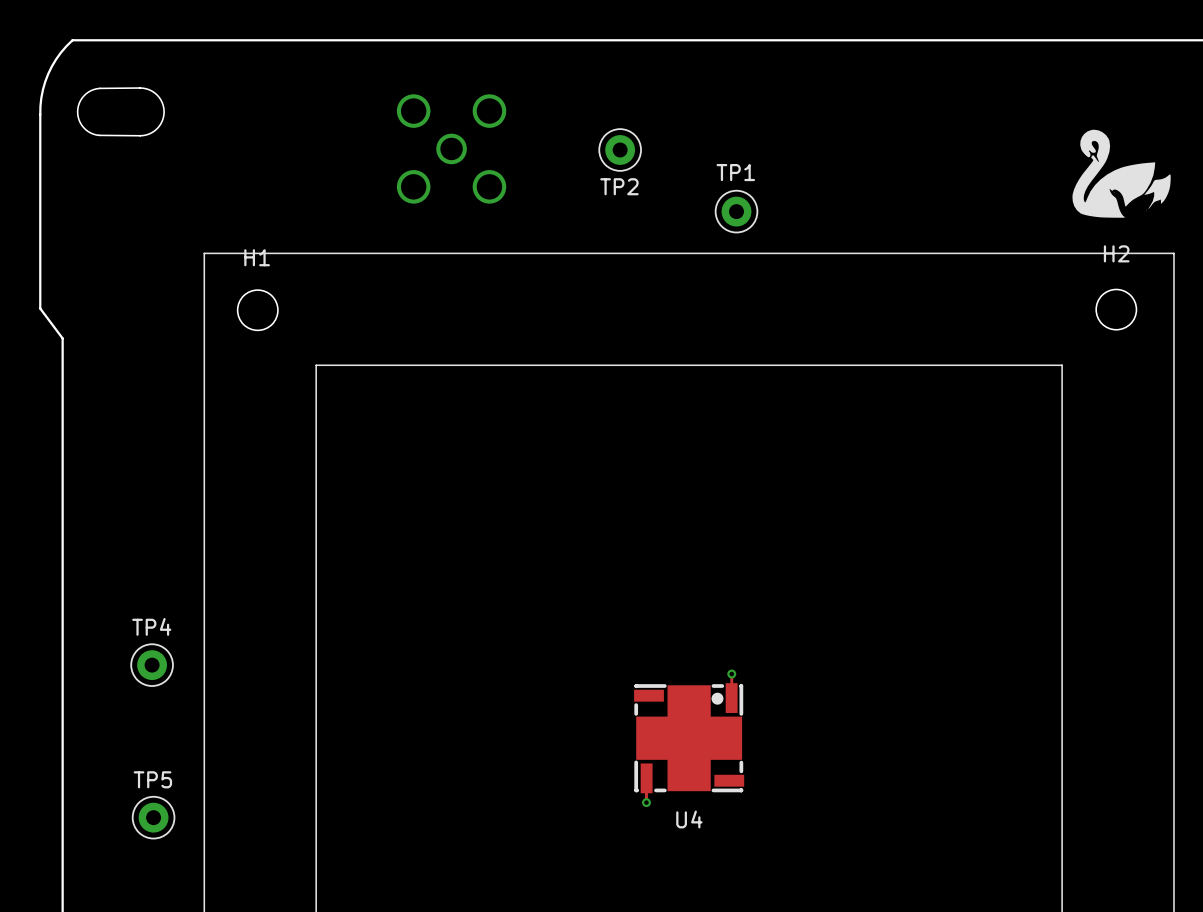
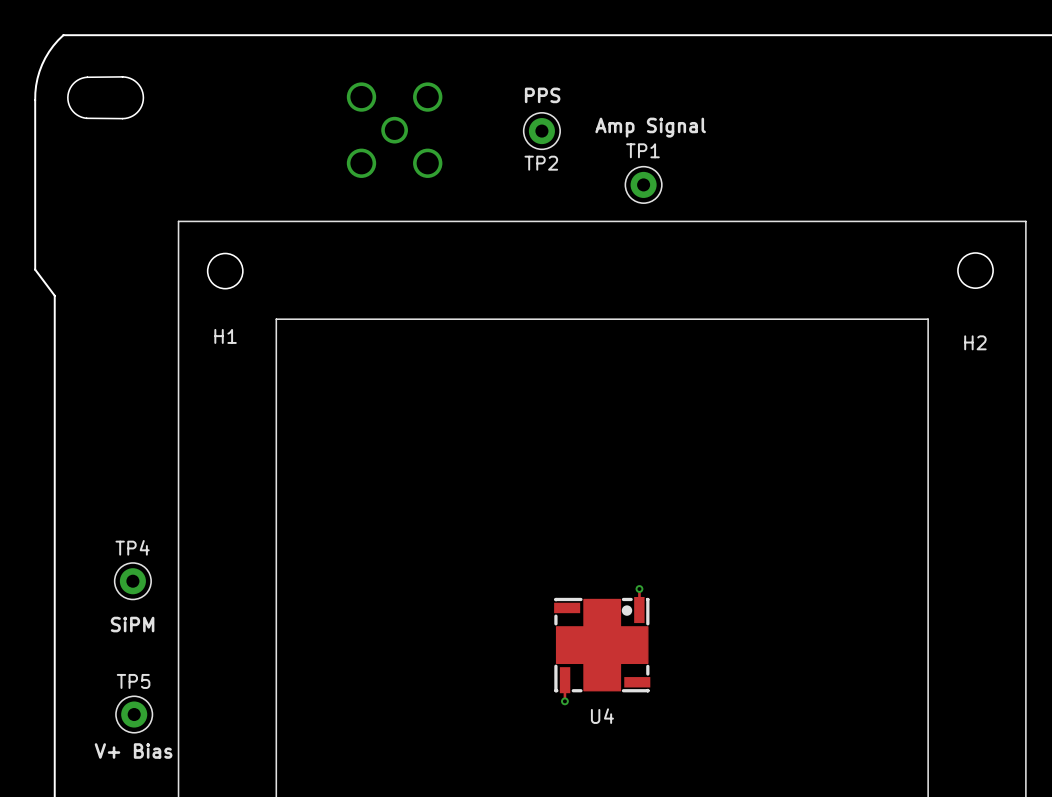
text: none -> PPS (542, 95)
drawing: [1072, 129, 1171, 218] -> none
text: none -> Amp Signal (650, 127)
H2 name position: H2 (1116, 253) -> H2 (975, 342)
H1 name position: H1 (257, 257) -> H1 (225, 336)
TP4 value: none -> SiPM (132, 624)
TP5 value: none -> V+ Bias (133, 750)

